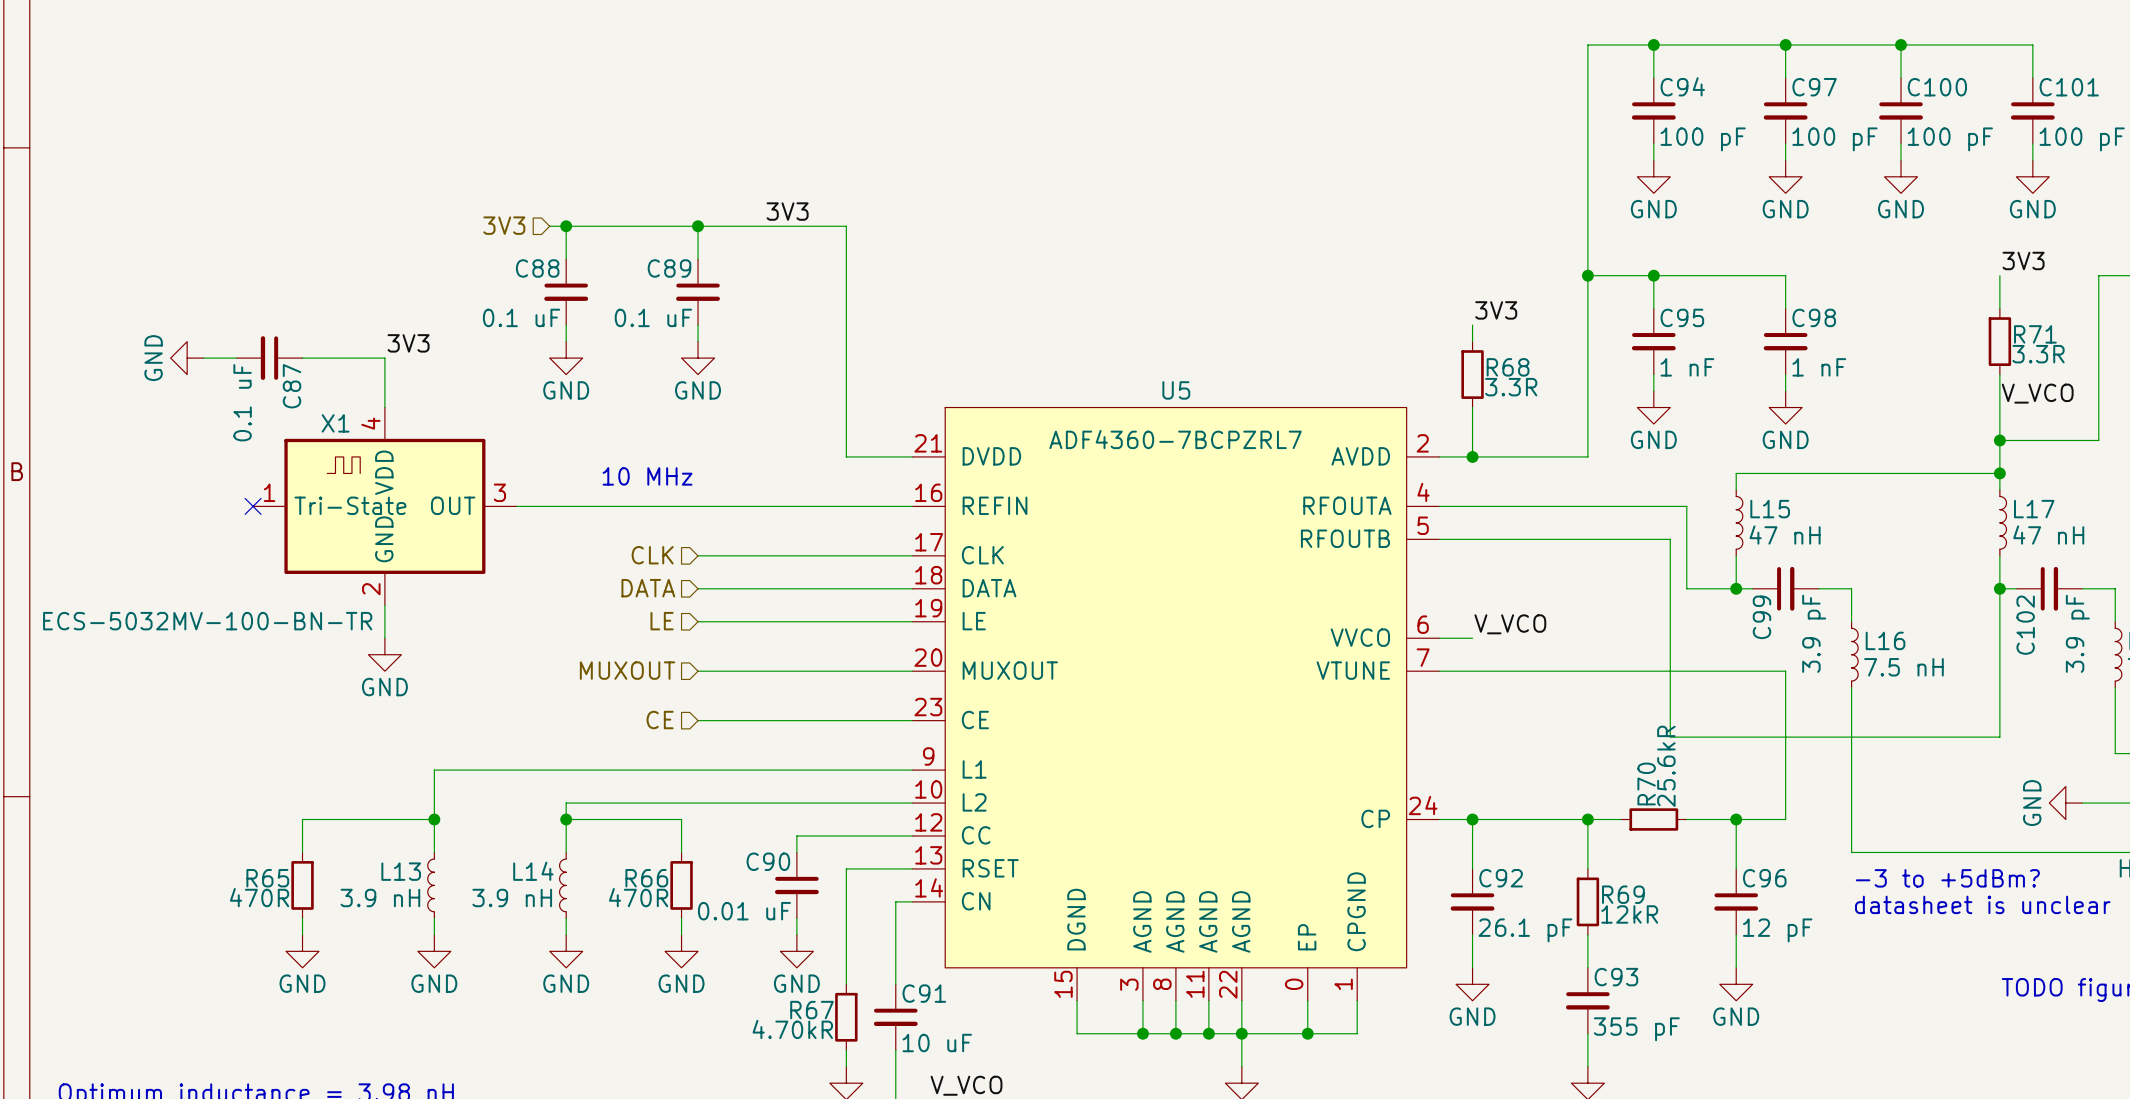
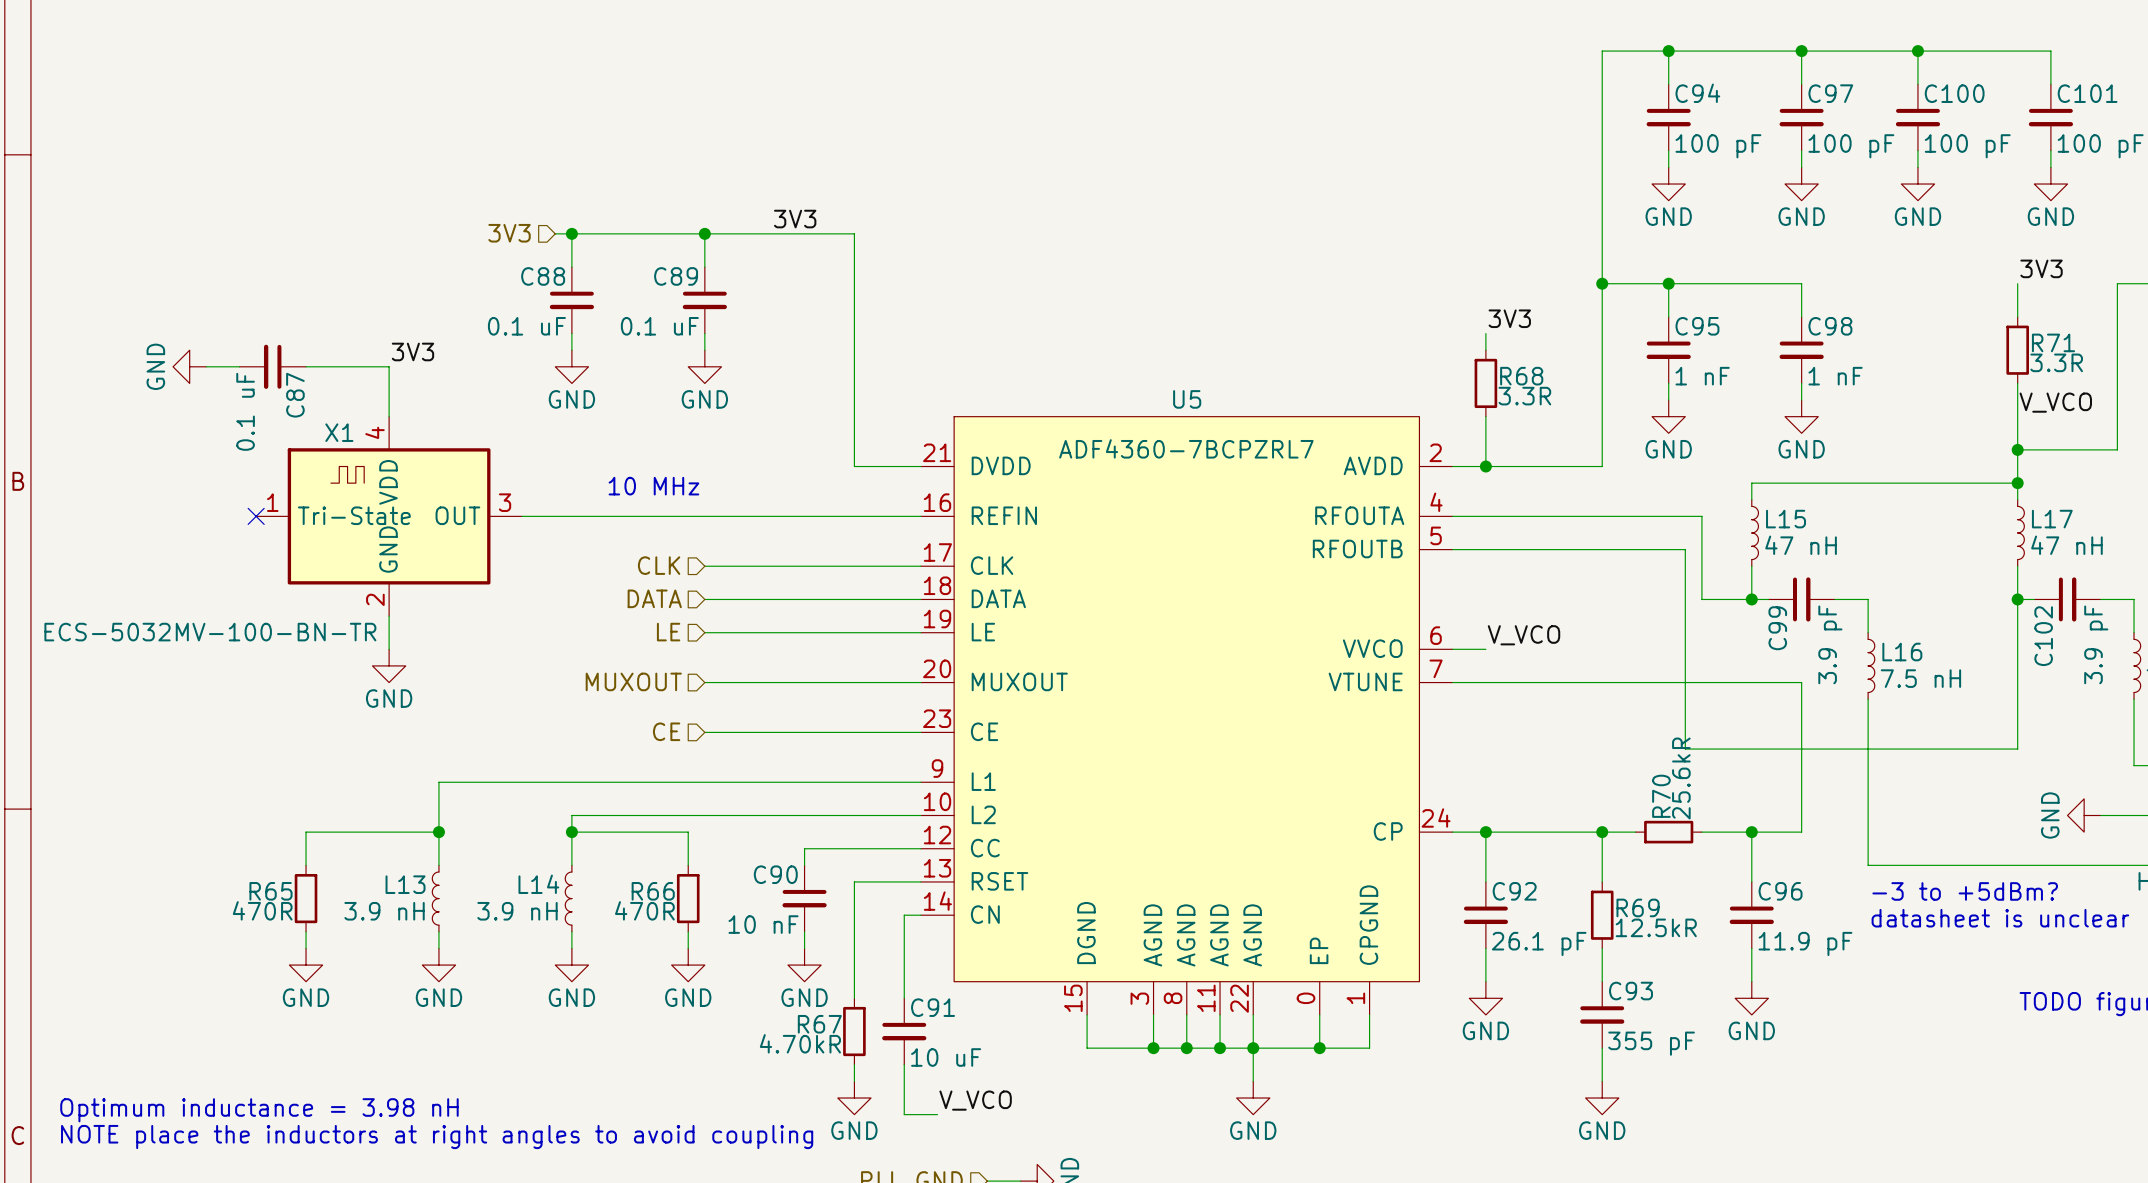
C90 value: 0.01 uF (744, 911) -> 10 nF (763, 924)
R69 value: 12kR (1629, 914) -> 12.5kR (1656, 927)
C96 value: 12 pF (1777, 930) -> 11.9 pF (1805, 943)

